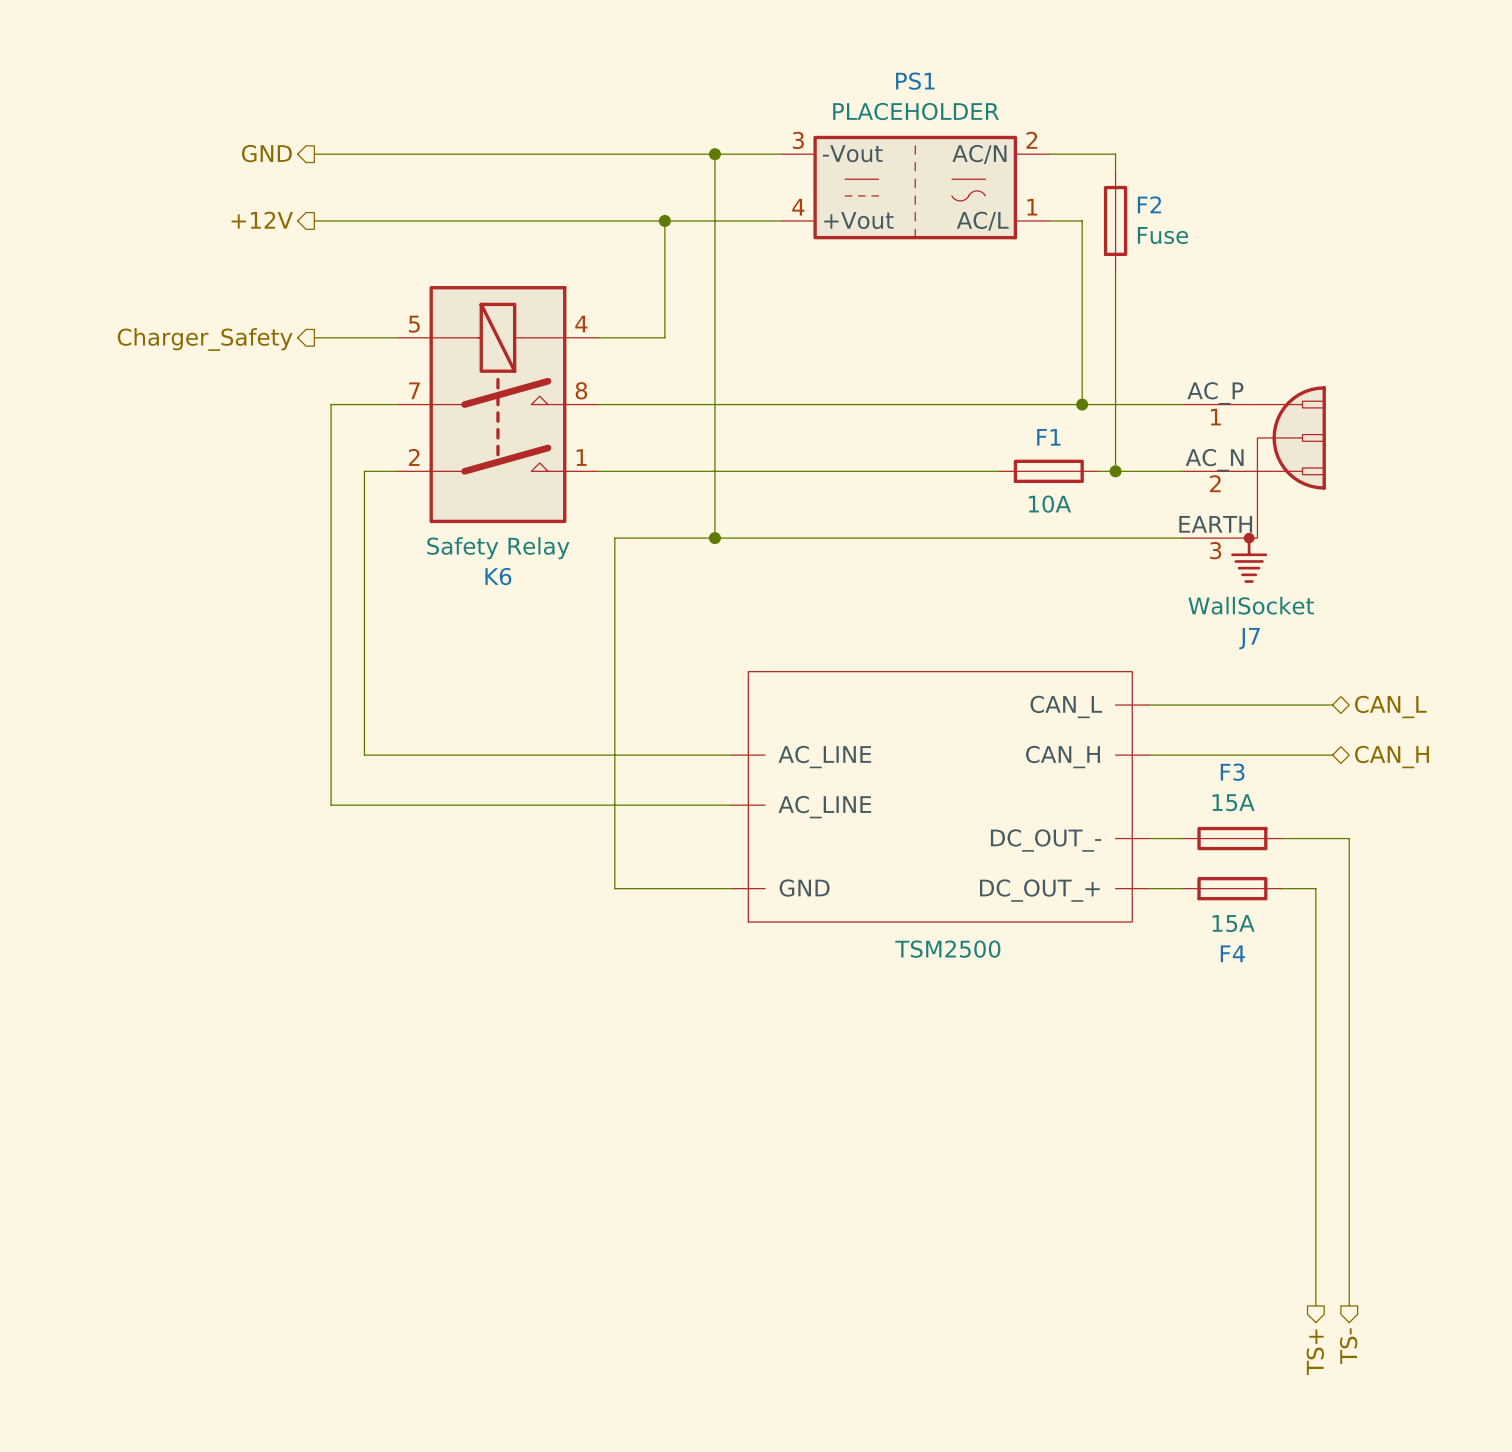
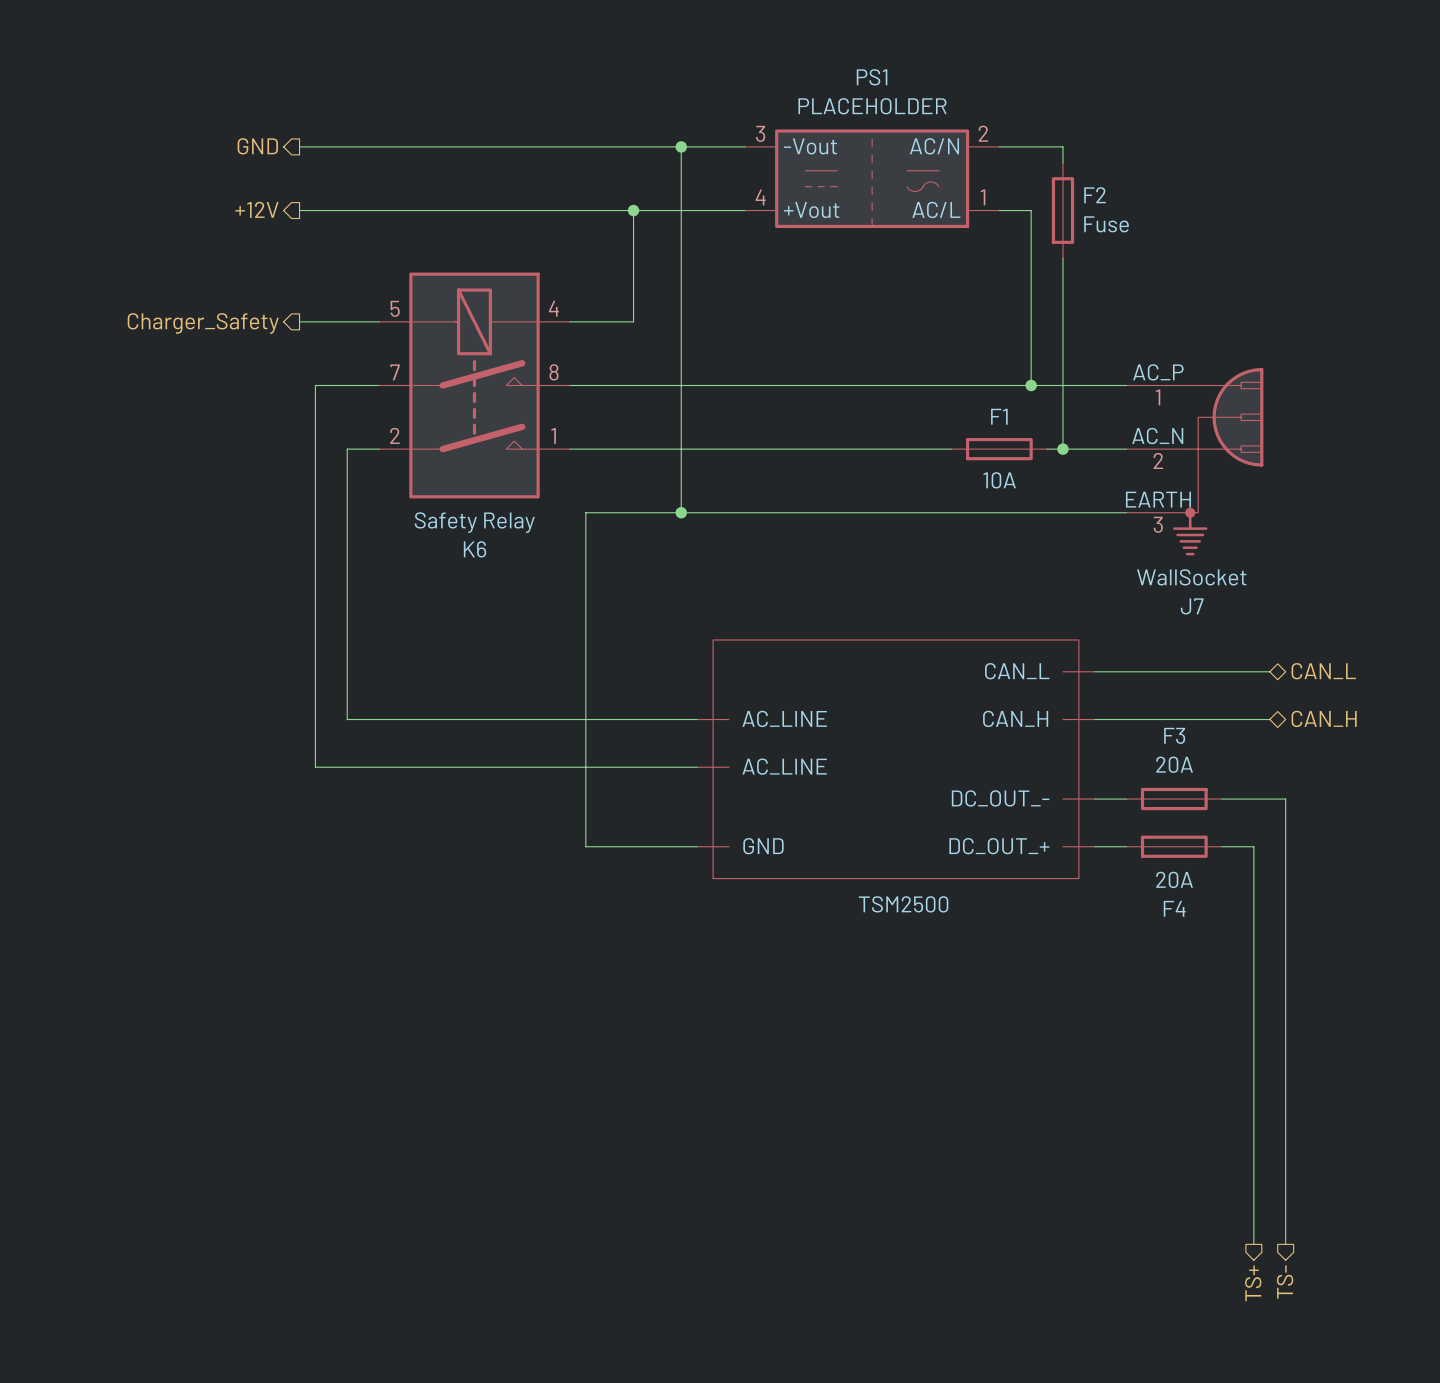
F3 value: 15A (1233, 802) -> 20A (1174, 764)
F4 value: 15A (1233, 923) -> 20A (1174, 879)

